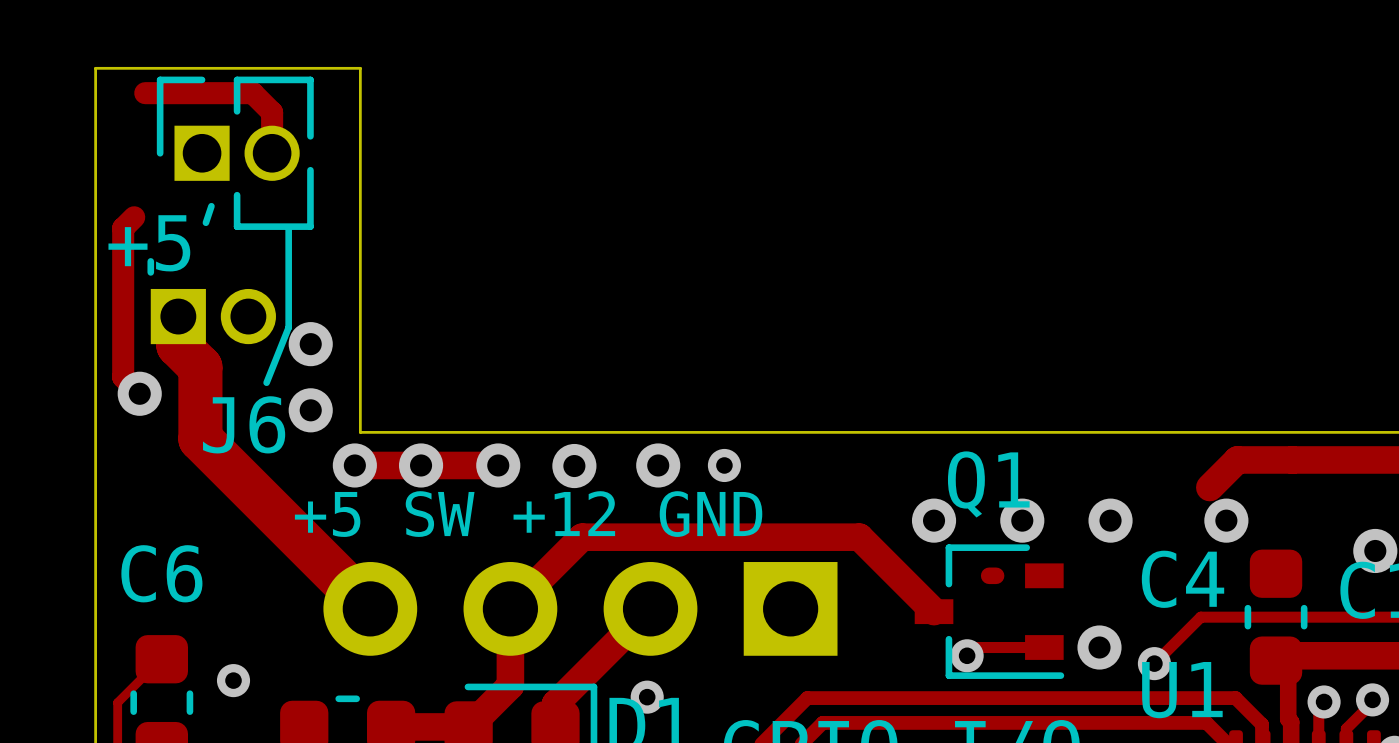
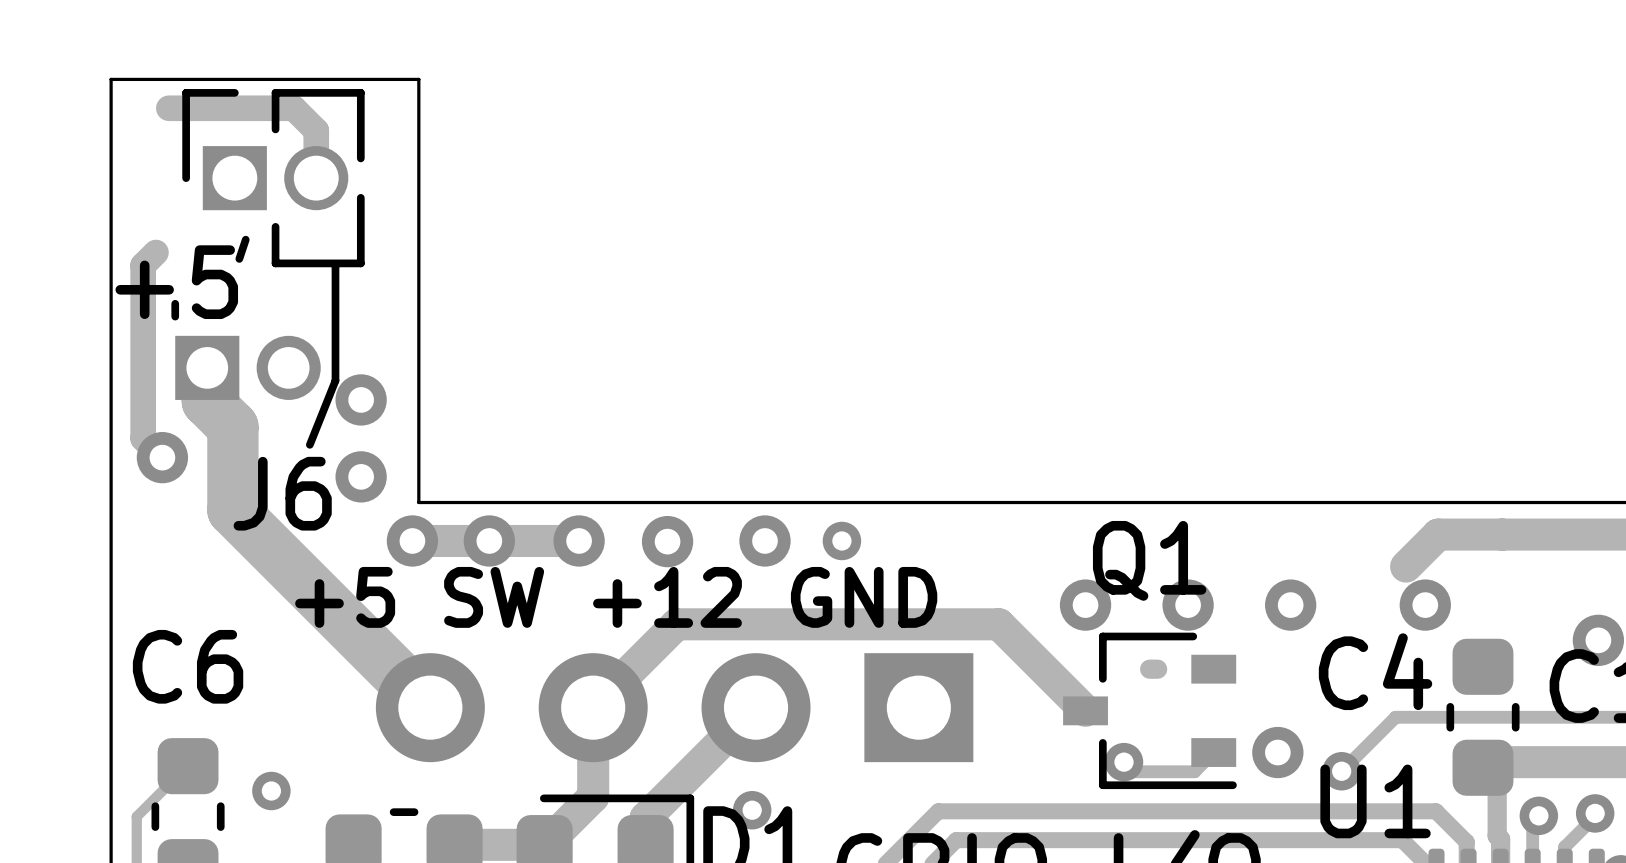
track: (1044, 647) (975, 647) (967, 655) -> (1213, 752) (1194, 771) (1124, 771)

